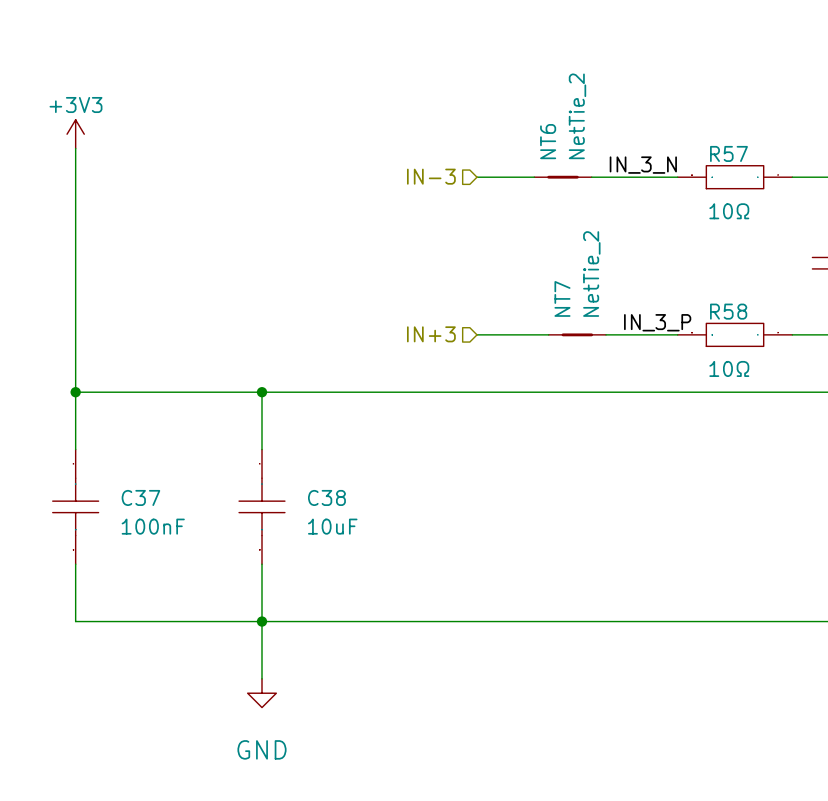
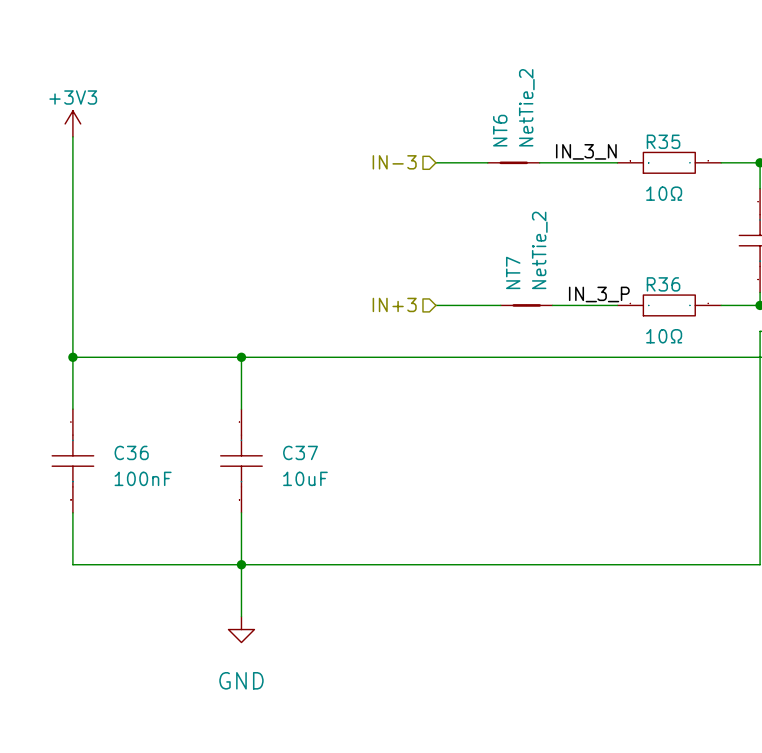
R57 name: R57 (728, 153) -> R35 (663, 141)
R58 name: R58 (728, 311) -> R36 (663, 284)
C37 name: C37 (140, 497) -> C36 (131, 452)
C38 name: C38 (326, 497) -> C37 (300, 452)

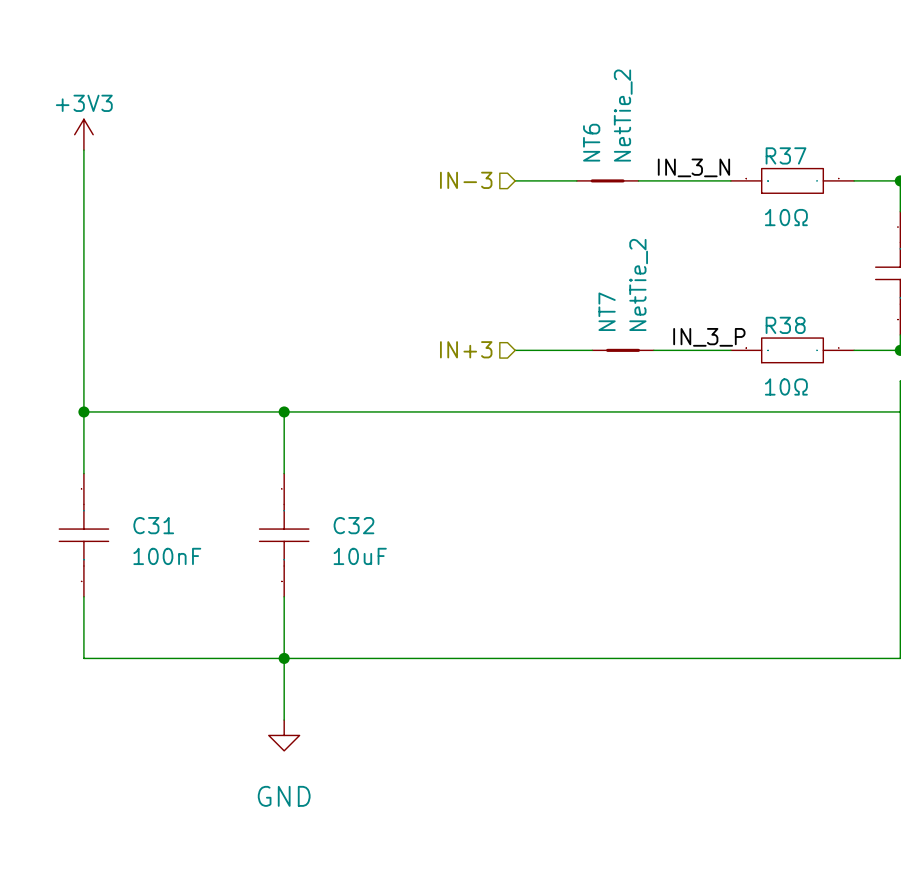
R35 name: R35 (663, 141) -> R37 (786, 155)
R36 name: R36 (663, 284) -> R38 (785, 325)
C36 name: C36 (131, 452) -> C31 (153, 525)
C37 name: C37 (300, 452) -> C32 (353, 525)

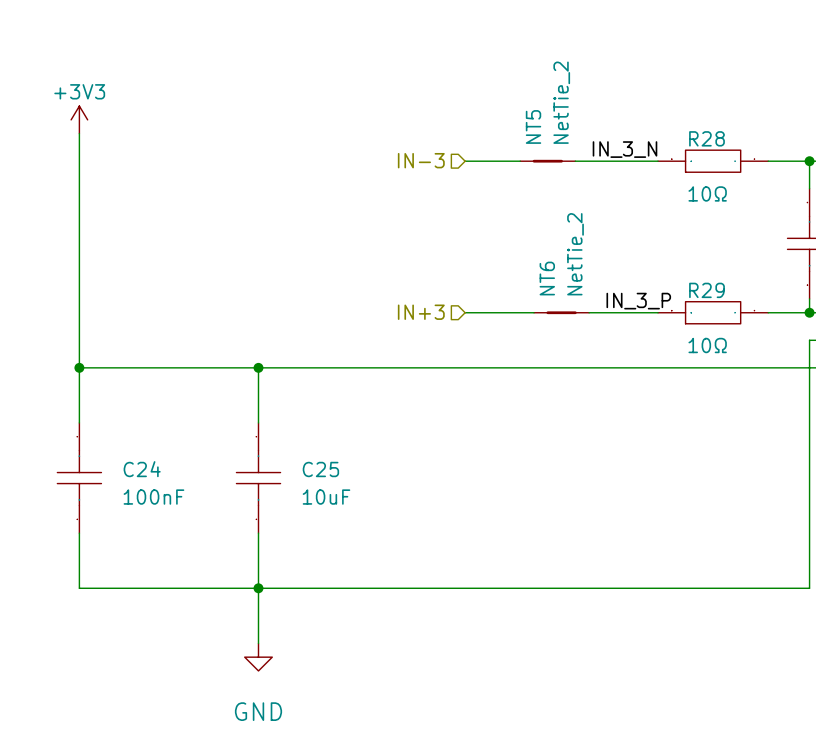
NT6 name: NT6 (591, 142) -> NT5 (533, 126)
R37 name: R37 (786, 155) -> R28 (706, 138)
NT7 name: NT7 (607, 311) -> NT6 (547, 278)
R38 name: R38 (785, 325) -> R29 (706, 290)
C31 name: C31 (153, 525) -> C24 (142, 469)
C32 name: C32 (353, 525) -> C25 (320, 469)

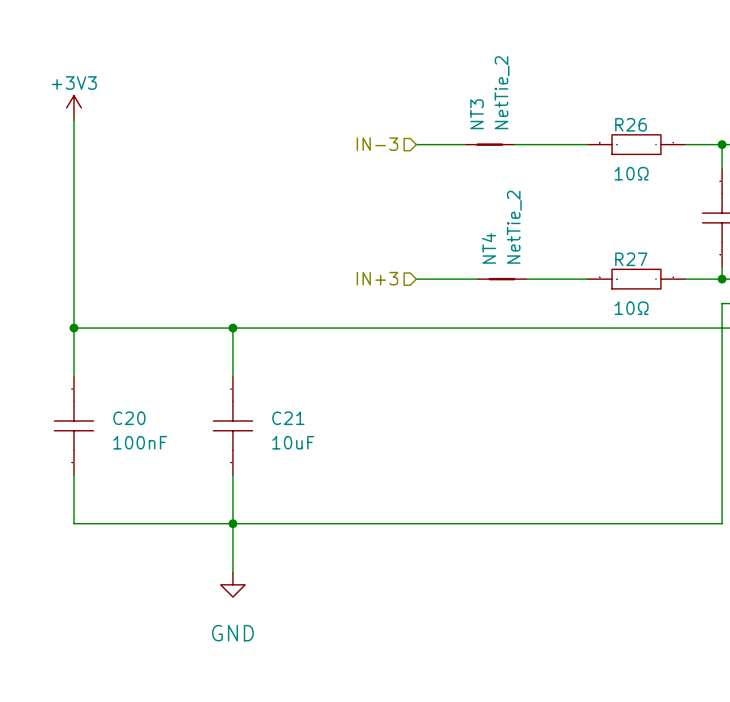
NT5 name: NT5 (533, 126) -> NT3 (477, 114)
R28 name: R28 (706, 138) -> R26 (631, 124)
label: IN_3_N (624, 149) -> none
NT6 name: NT6 (547, 278) -> NT4 (488, 248)
R29 name: R29 (706, 290) -> R27 (631, 259)
label: IN_3_P (638, 301) -> none
C24 name: C24 (142, 469) -> C20 (129, 418)
C25 name: C25 (320, 469) -> C21 (288, 418)

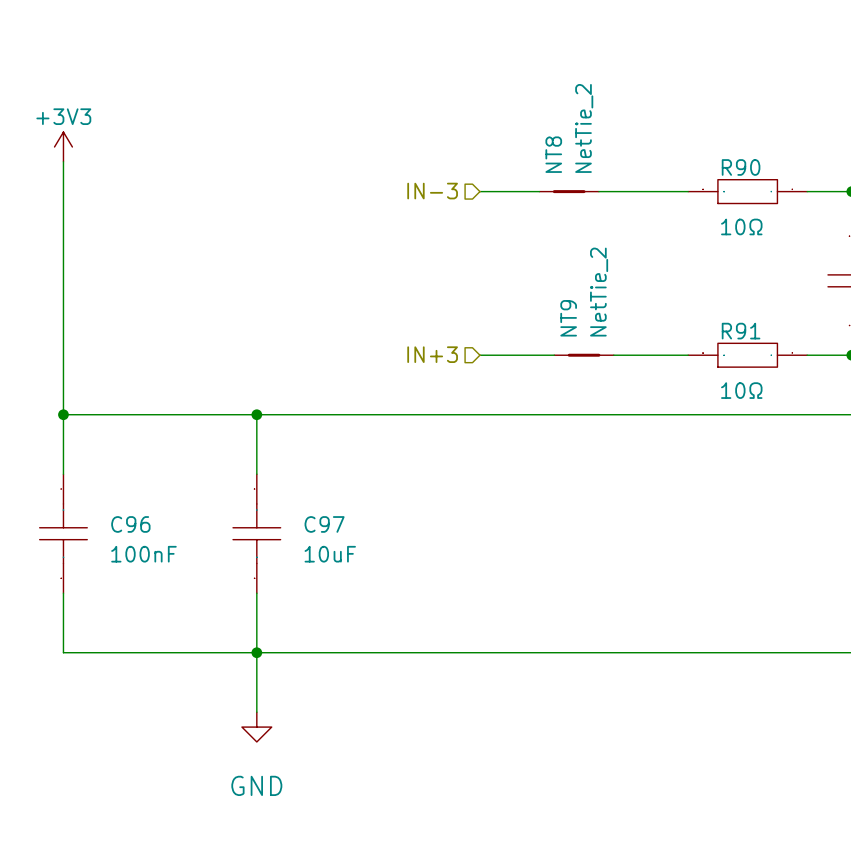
NT3 name: NT3 (477, 114) -> NT8 (553, 154)
R26 name: R26 (631, 124) -> R90 (741, 167)
NT4 name: NT4 (488, 248) -> NT9 (568, 318)
R27 name: R27 (631, 259) -> R91 (741, 331)
C20 name: C20 (129, 418) -> C96 (130, 524)
C21 name: C21 (288, 418) -> C97 (324, 524)

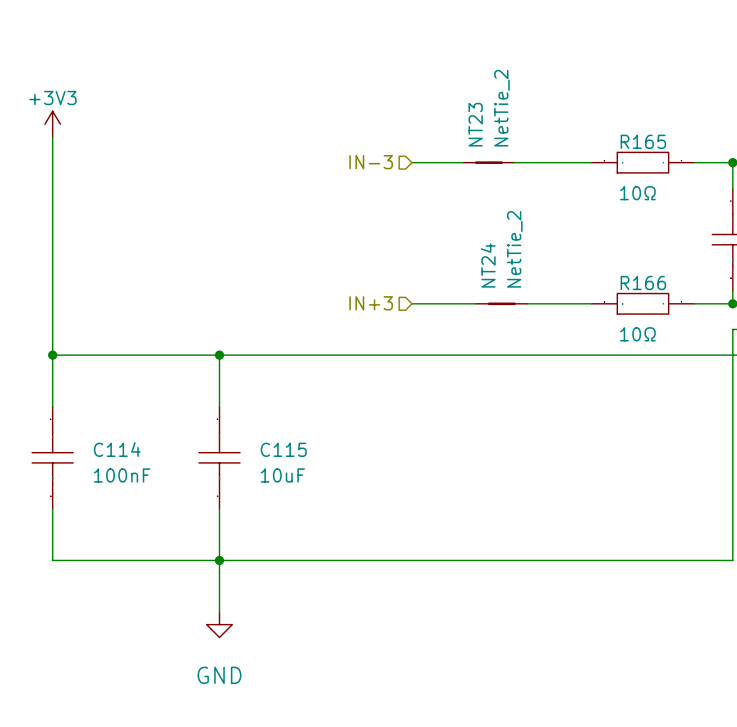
NT8 name: NT8 (553, 154) -> NT23 (475, 124)
R90 name: R90 (741, 167) -> R165 (643, 141)
NT9 name: NT9 (568, 318) -> NT24 (488, 265)
R91 name: R91 (741, 331) -> R166 (643, 282)
C96 name: C96 (130, 524) -> C114 (117, 449)
C97 name: C97 (324, 524) -> C115 (283, 449)

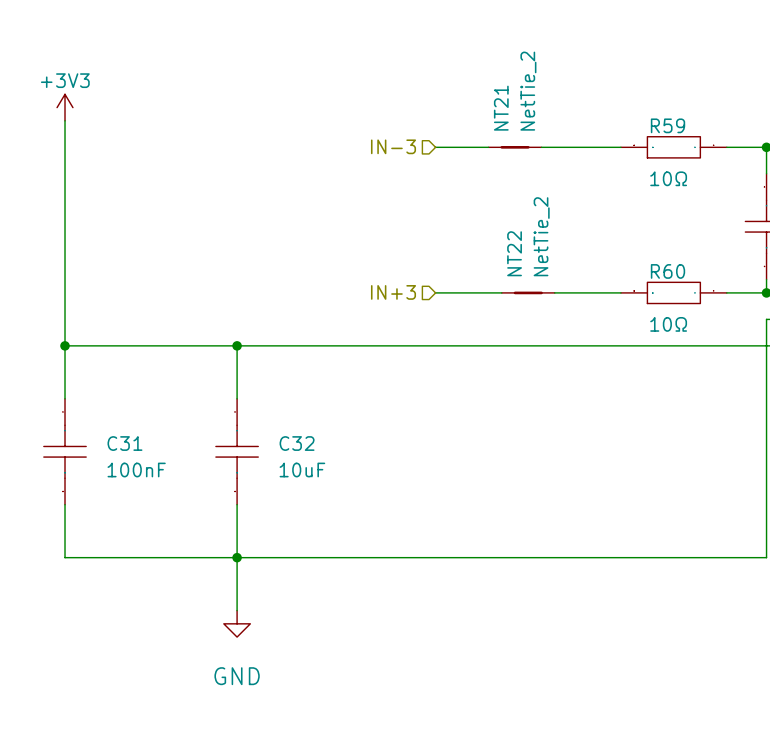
NT23 name: NT23 (475, 124) -> NT21 (501, 108)
R165 name: R165 (643, 141) -> R59 (667, 125)
NT24 name: NT24 (488, 265) -> NT22 (514, 253)
R166 name: R166 (643, 282) -> R60 (667, 271)
C114 name: C114 (117, 449) -> C31 (124, 443)
C115 name: C115 (283, 449) -> C32 (297, 443)

